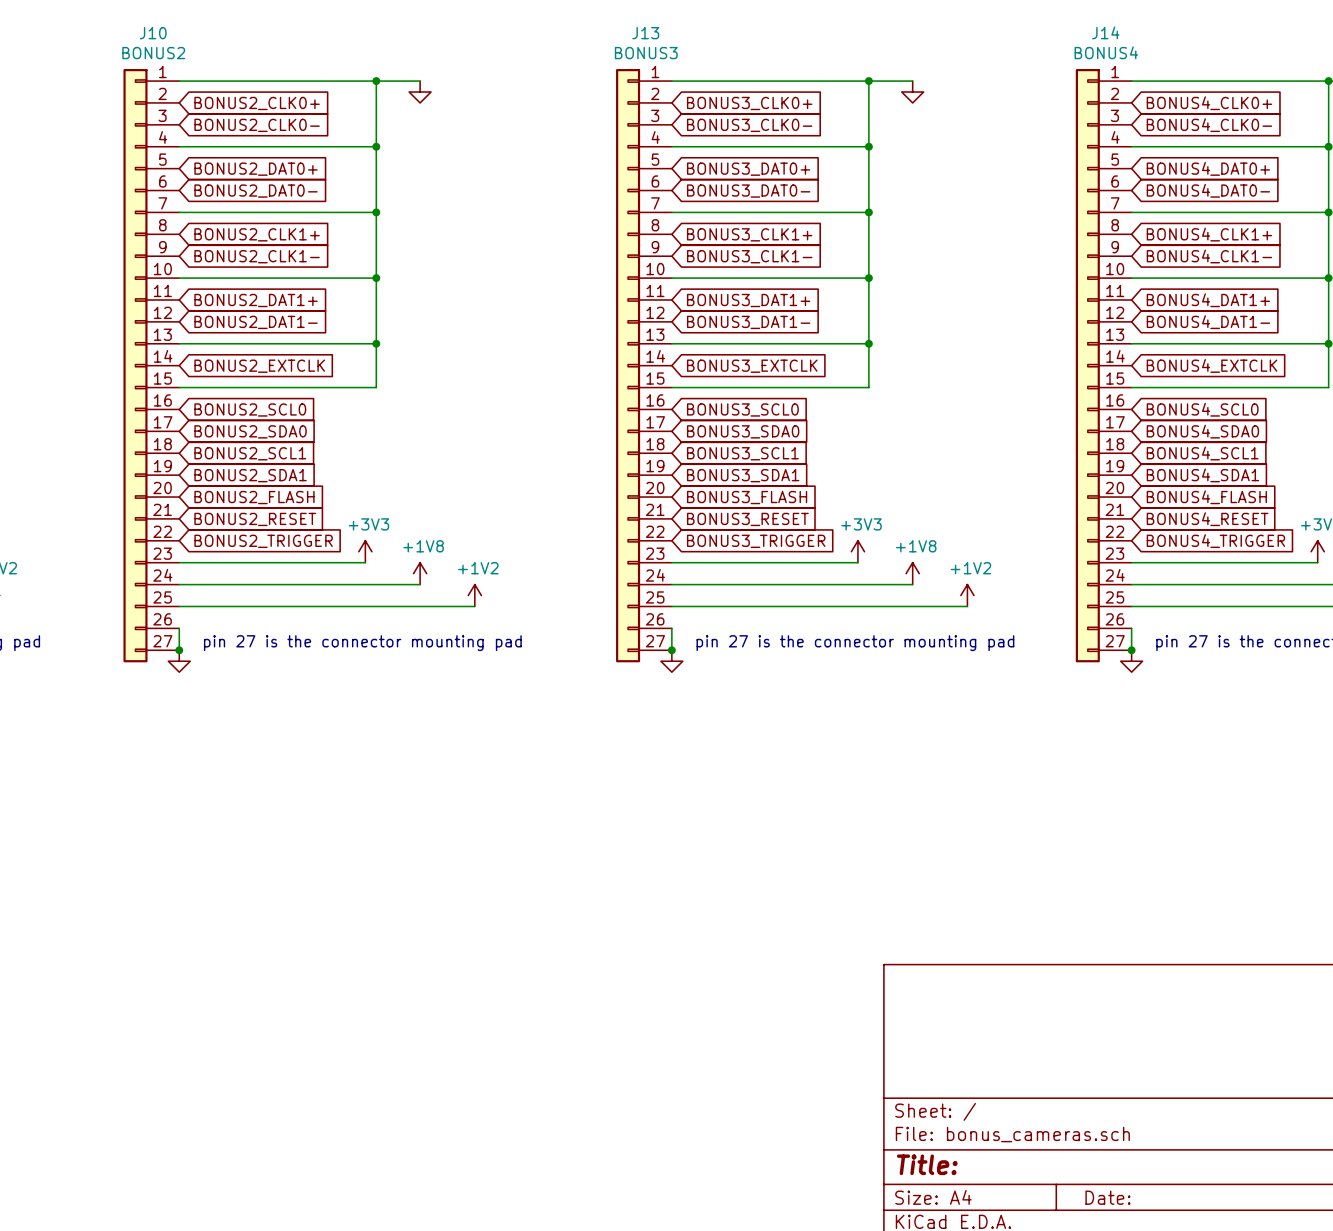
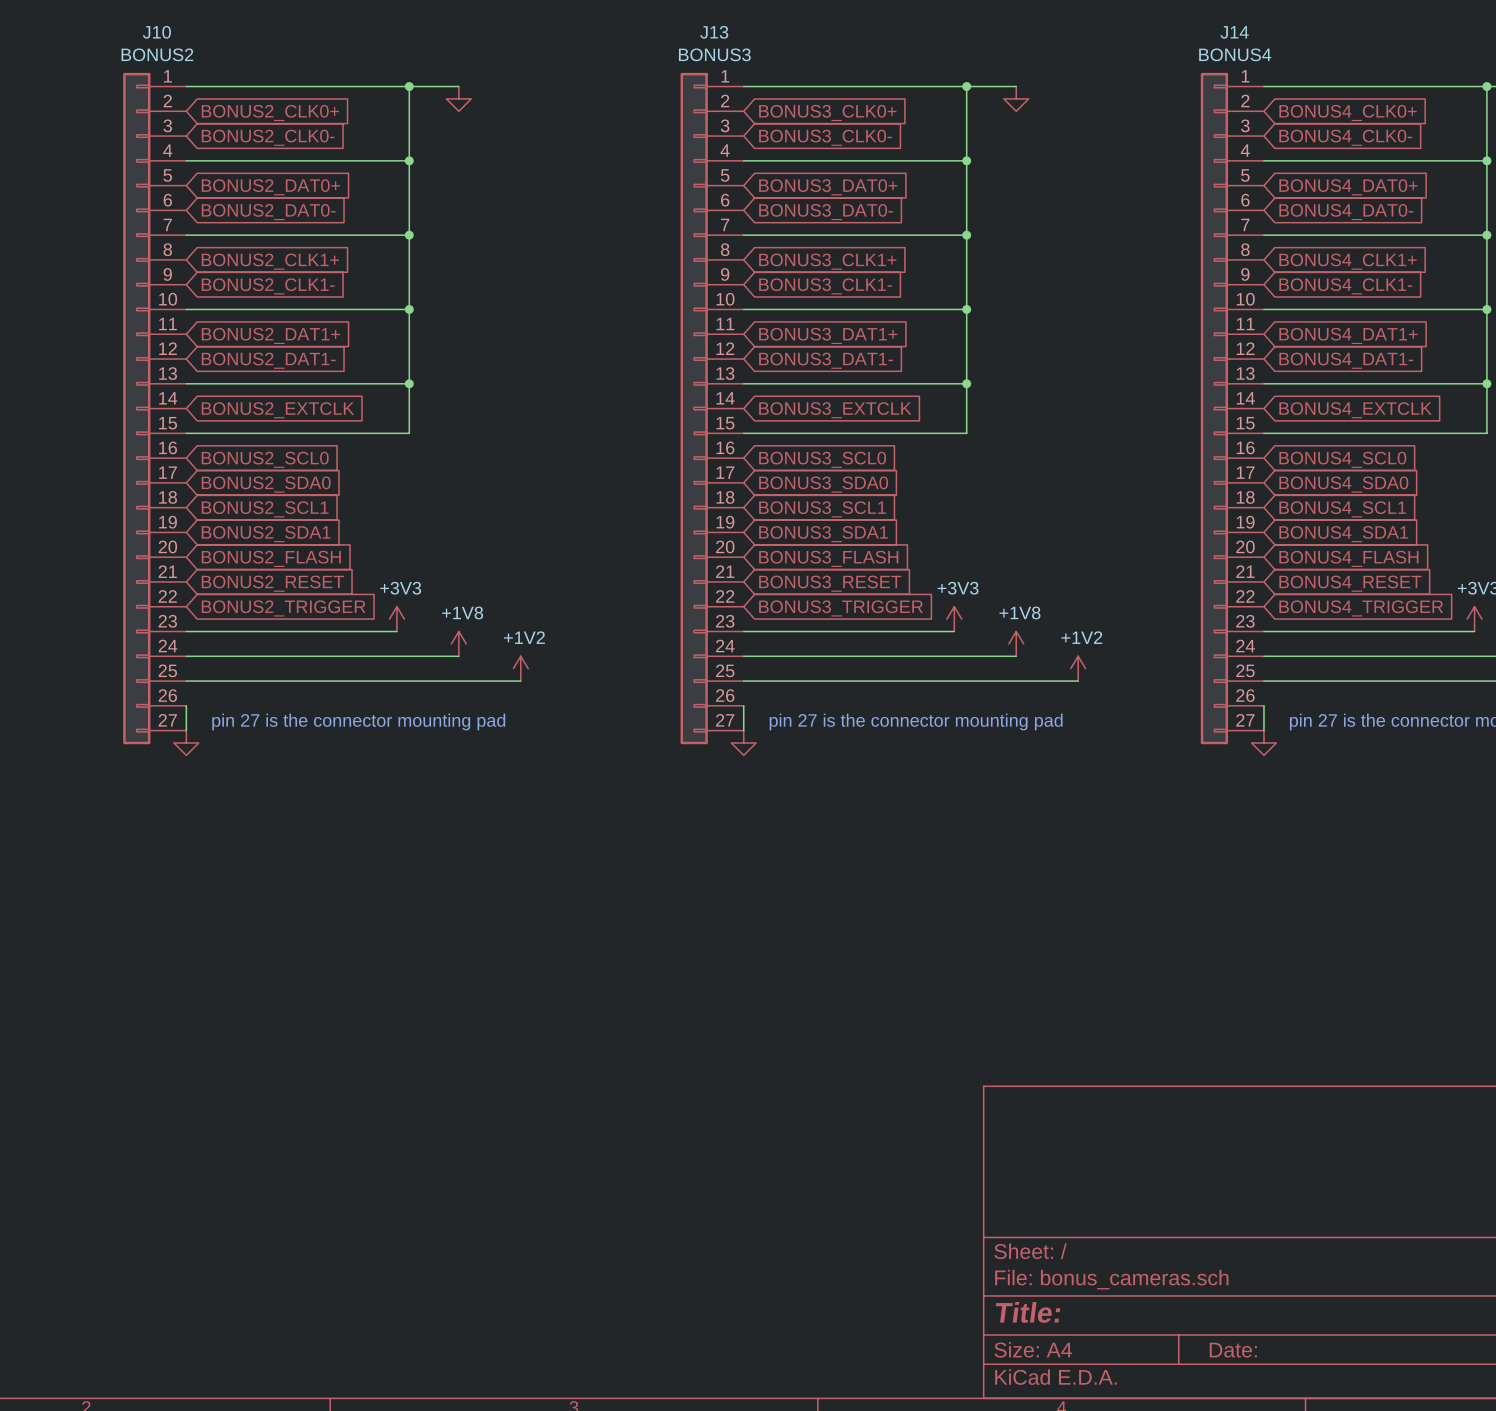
junction: (179, 650) -> none
junction: (671, 650) -> none
junction: (1131, 650) -> none

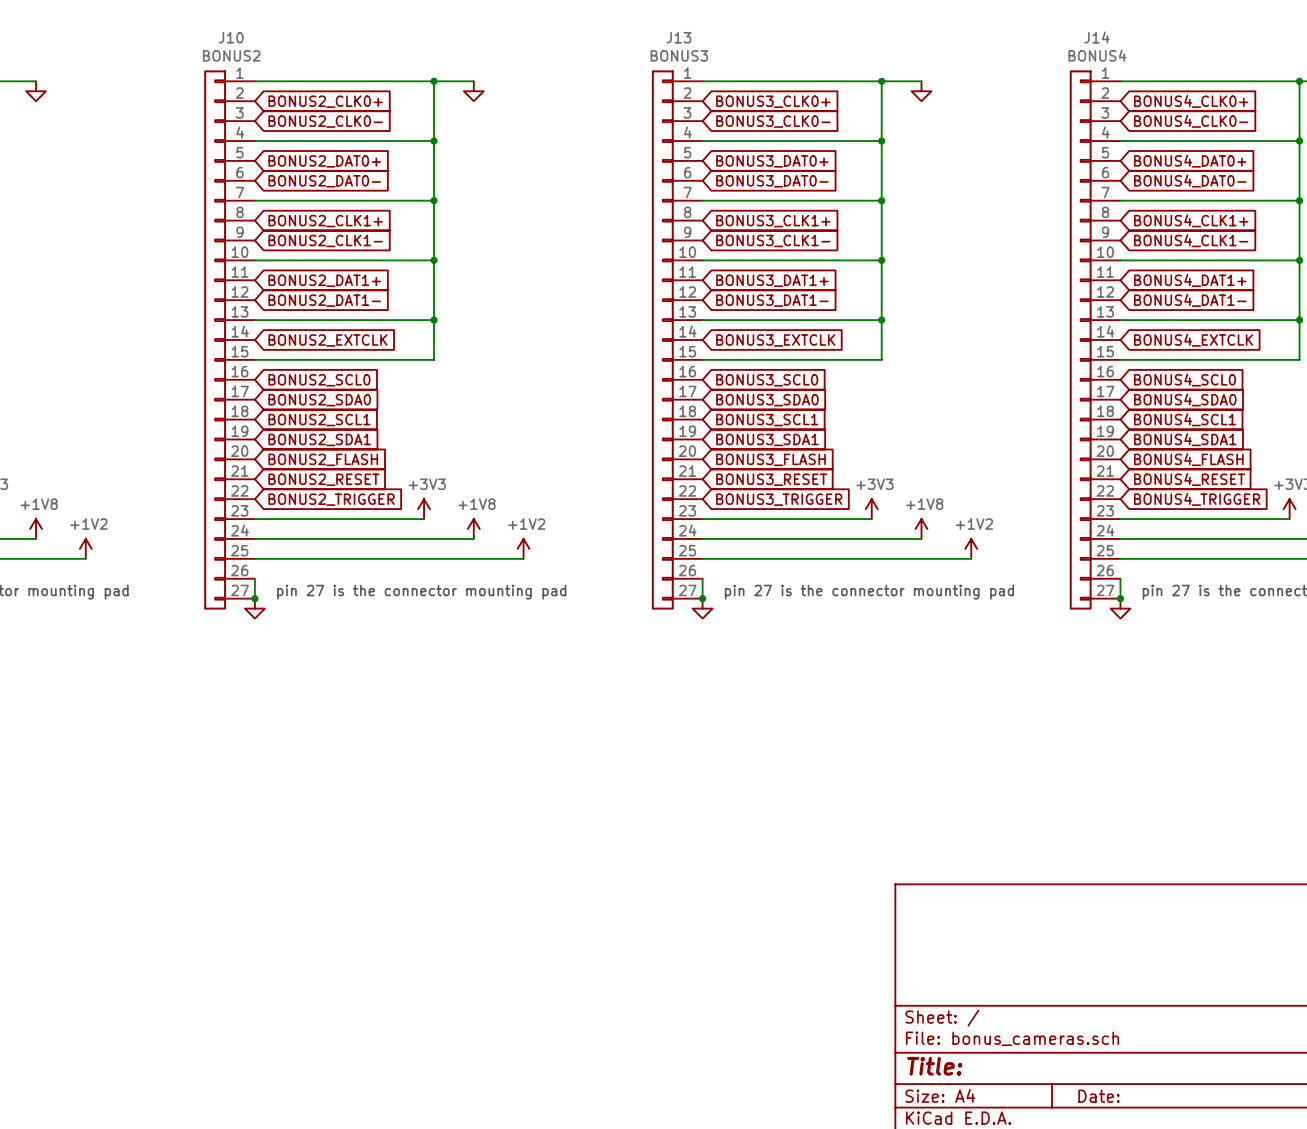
junction: none -> (254, 598)
junction: none -> (702, 598)
junction: none -> (1120, 598)

